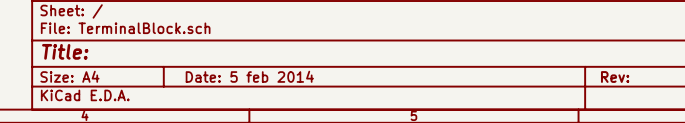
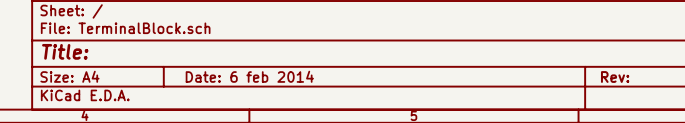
title block: Date: 5 feb 2014 (249, 76) -> Date: 6 feb 2014 (249, 76)

